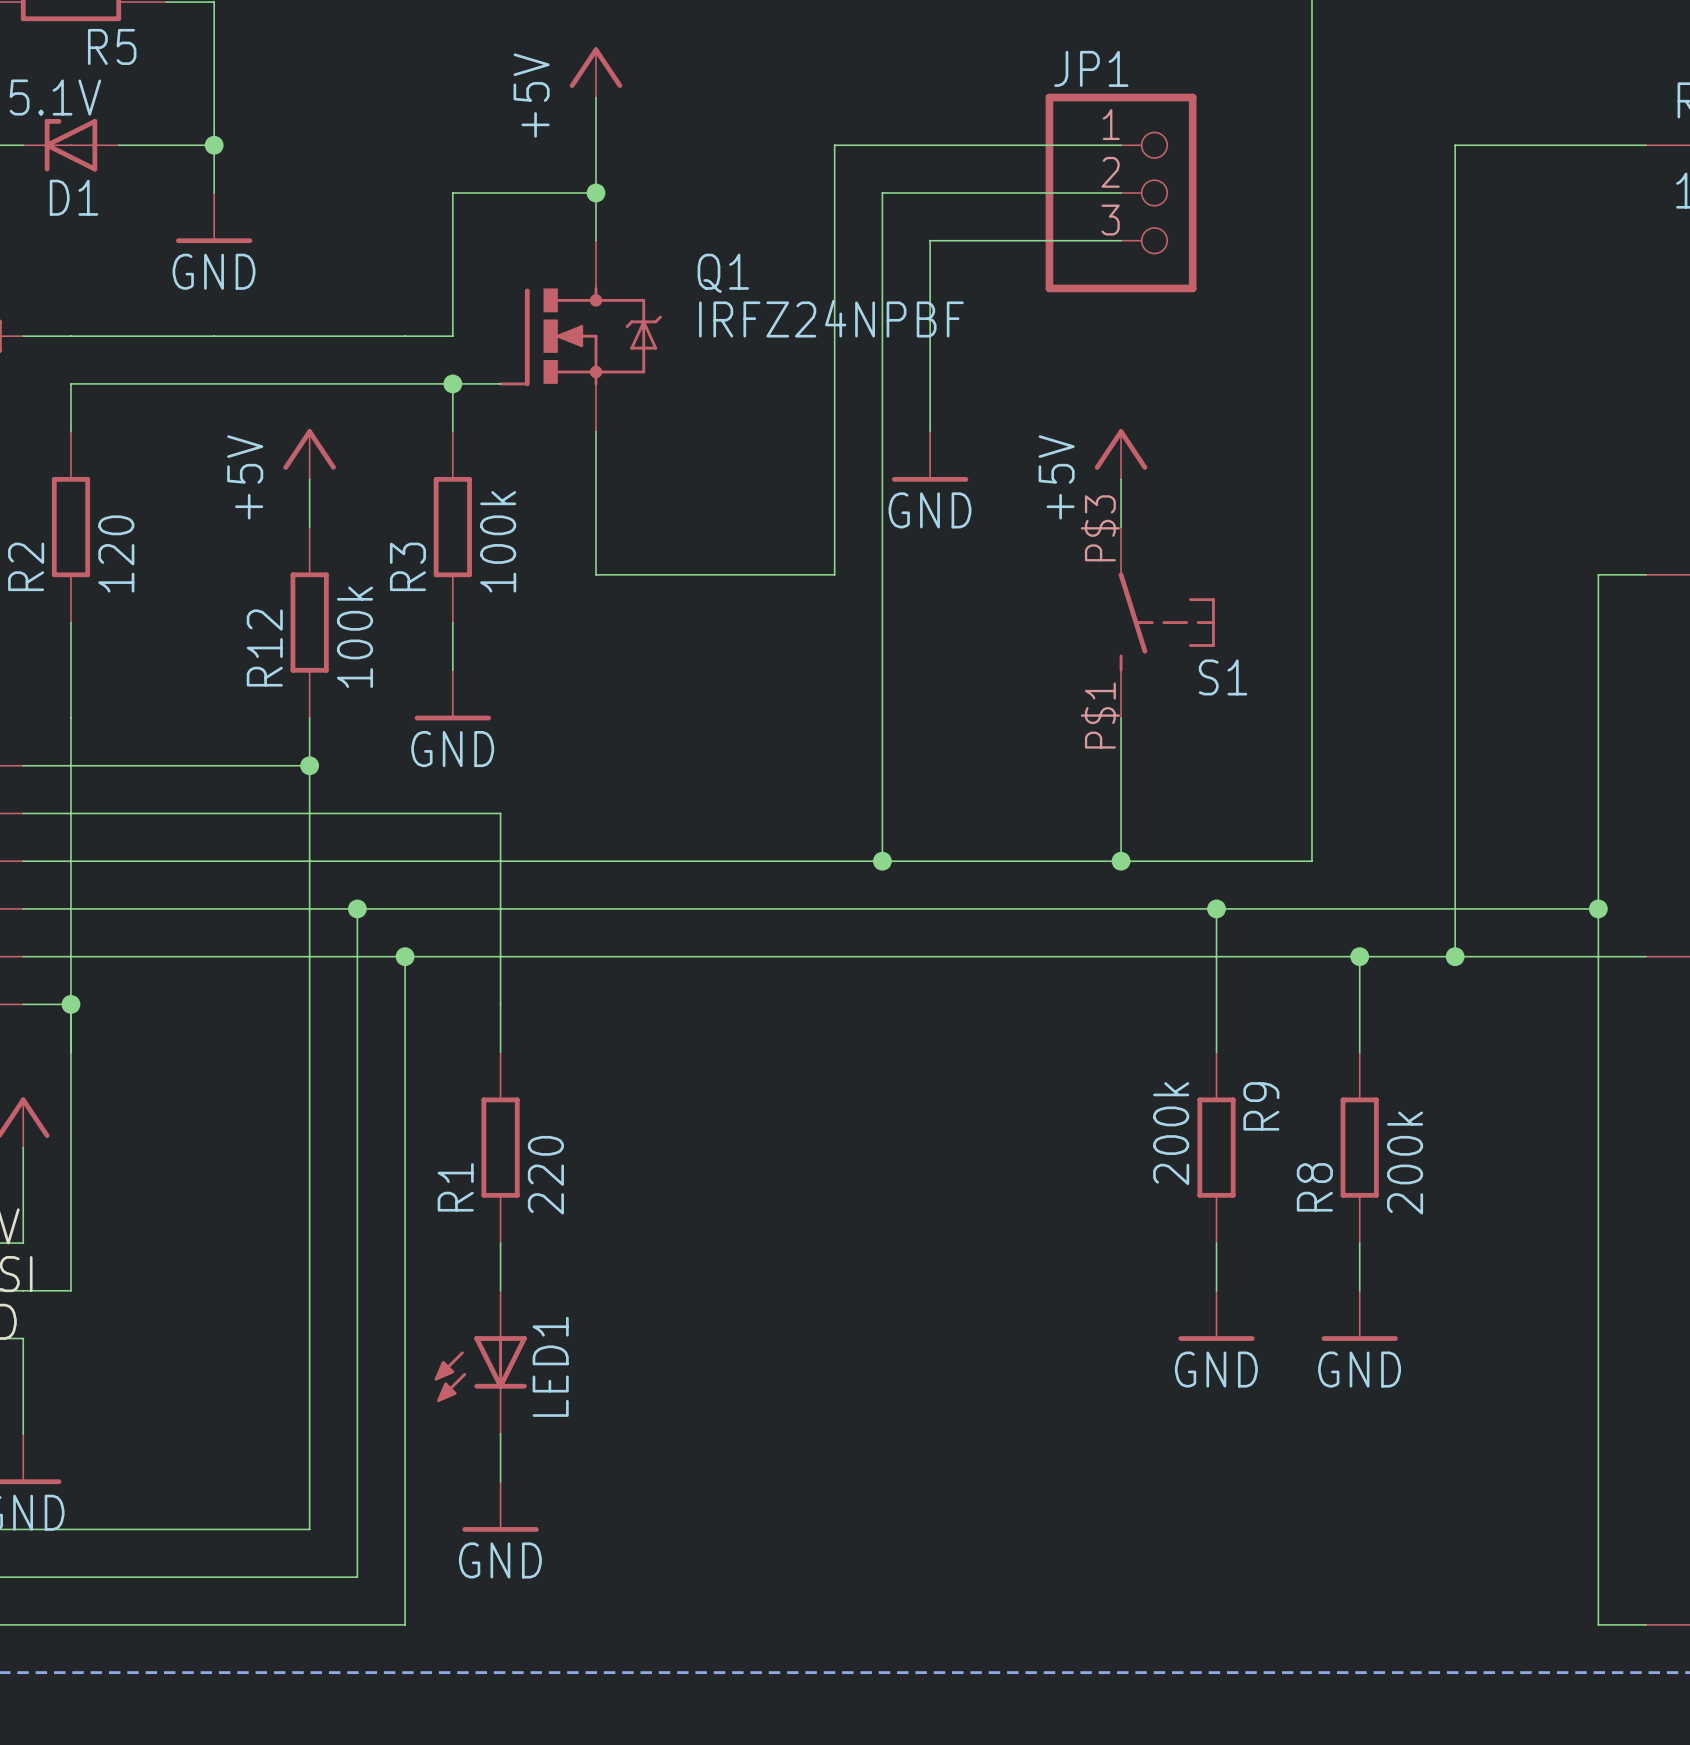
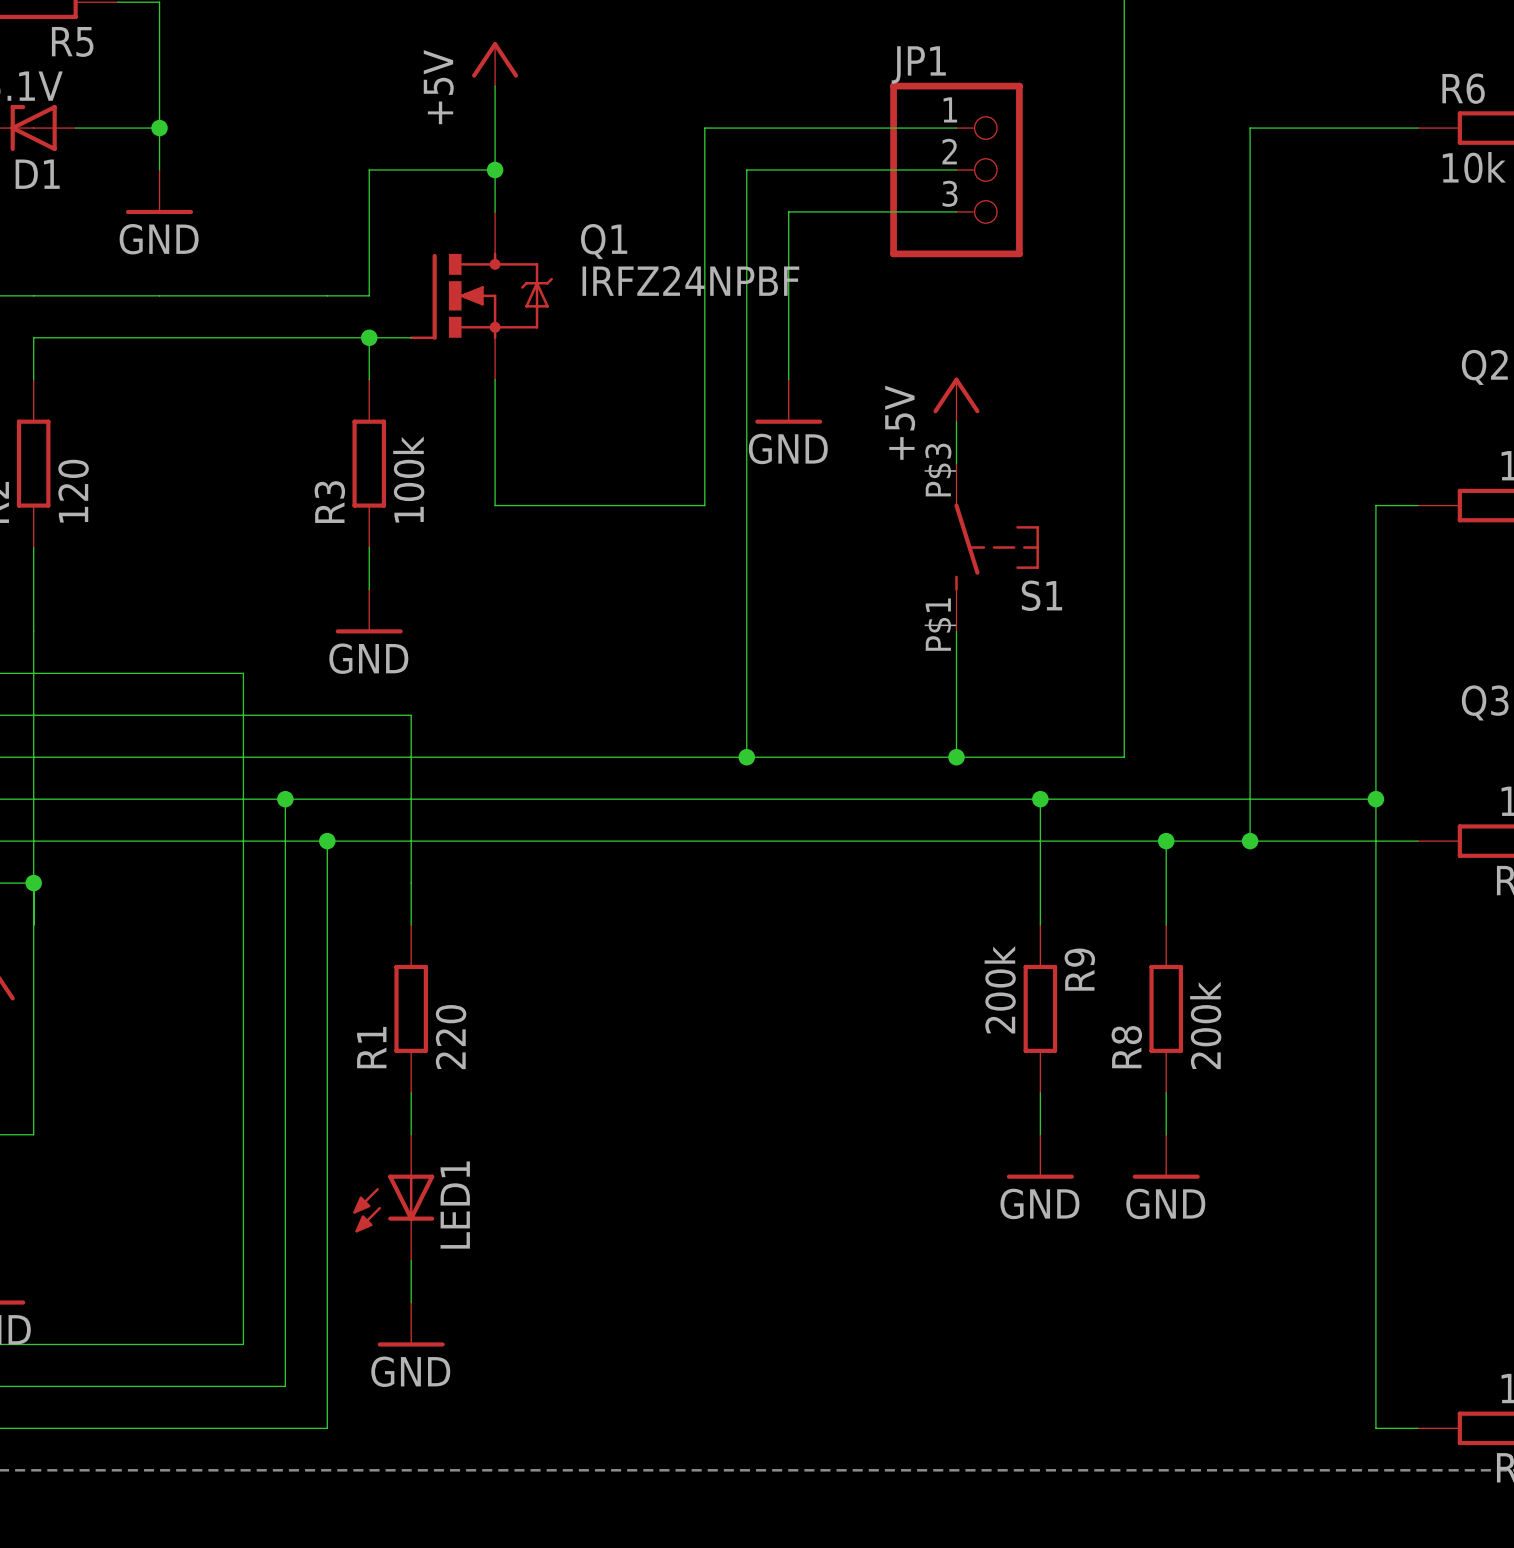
power symbol: +5V (309, 454) -> none
wire: (309, 479) (309, 527) -> none
R12: 100k (309, 622) -> none
wire: (309, 718) (309, 765) -> none
junction: (309, 765) -> none

